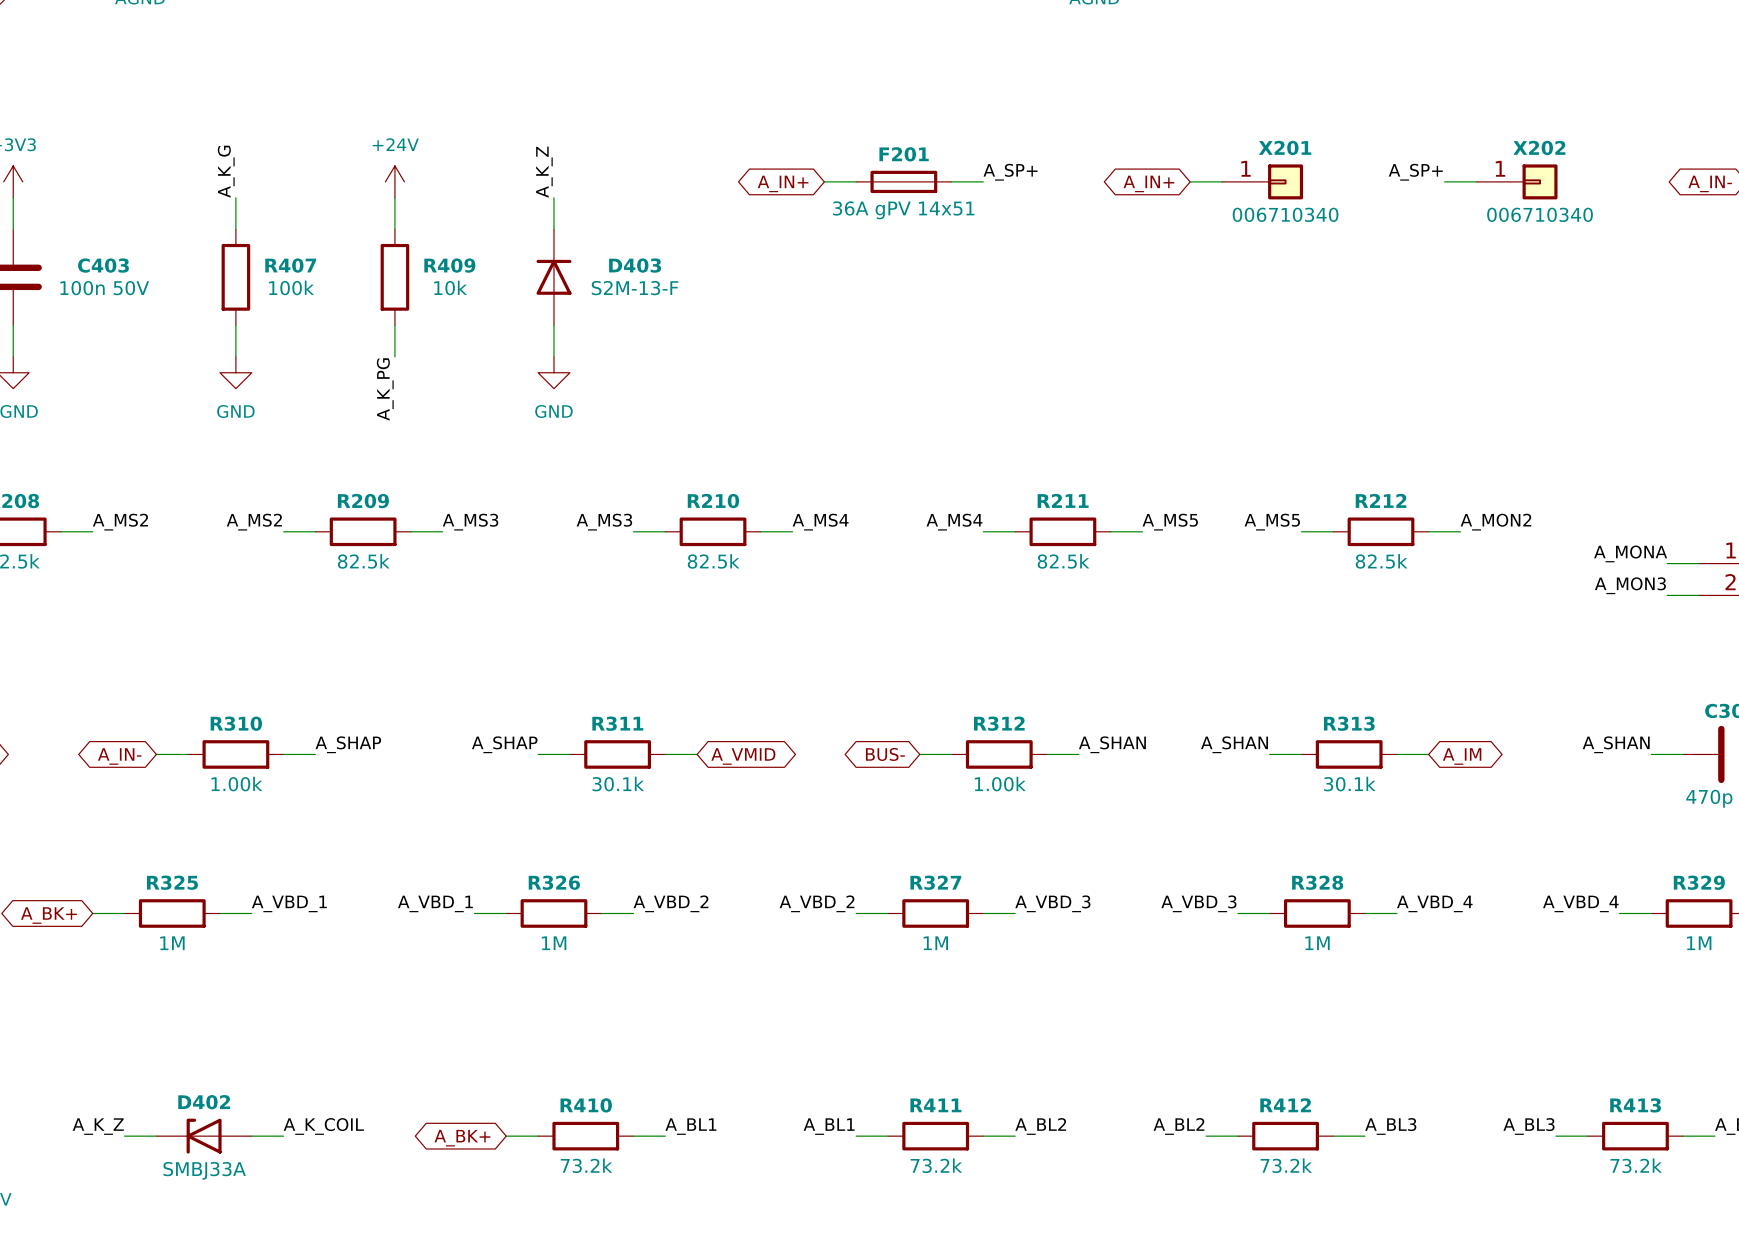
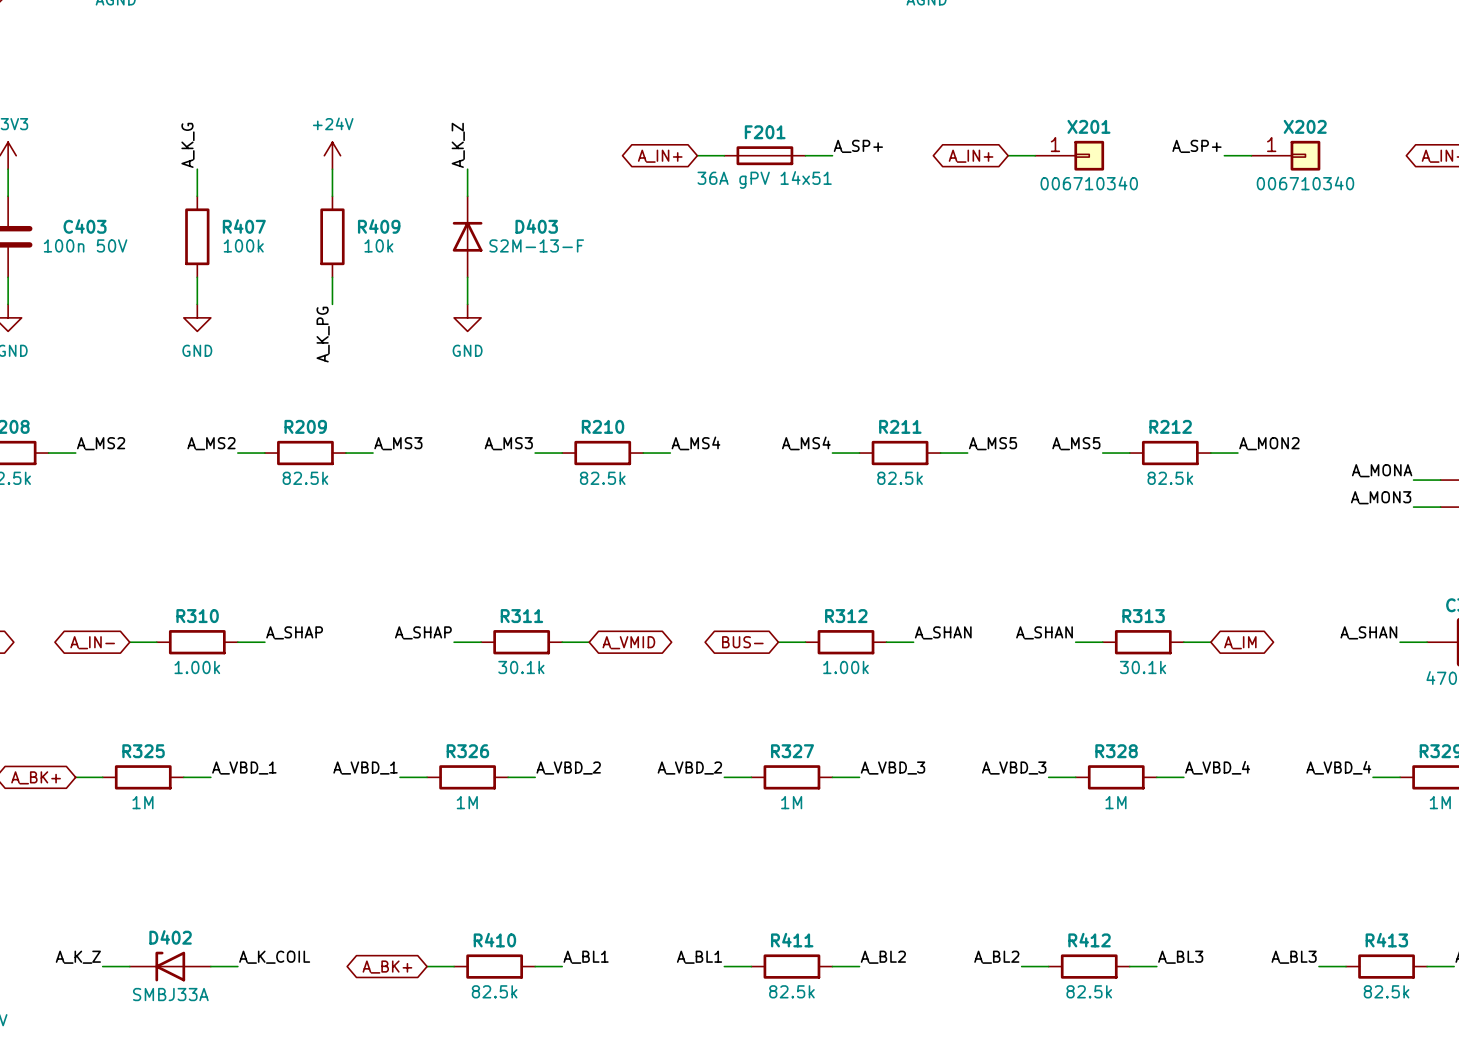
R410 value: 73.2k (586, 1165) -> 82.5k (494, 991)
R411 value: 73.2k (936, 1165) -> 82.5k (791, 991)
R412 value: 73.2k (1286, 1165) -> 82.5k (1089, 991)
R413 value: 73.2k (1636, 1165) -> 82.5k (1386, 991)

